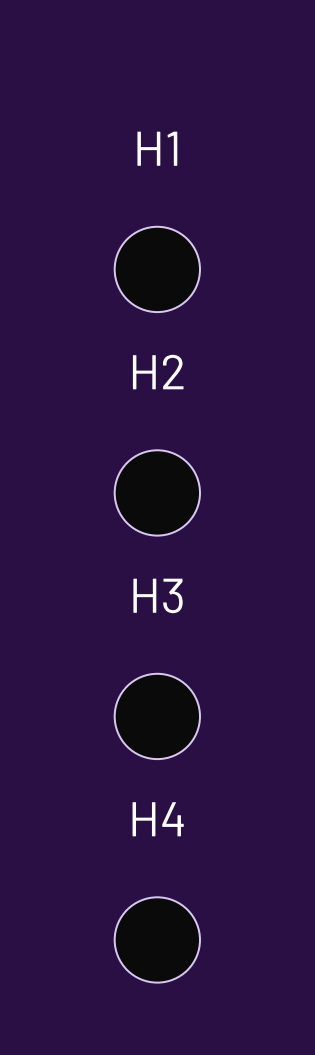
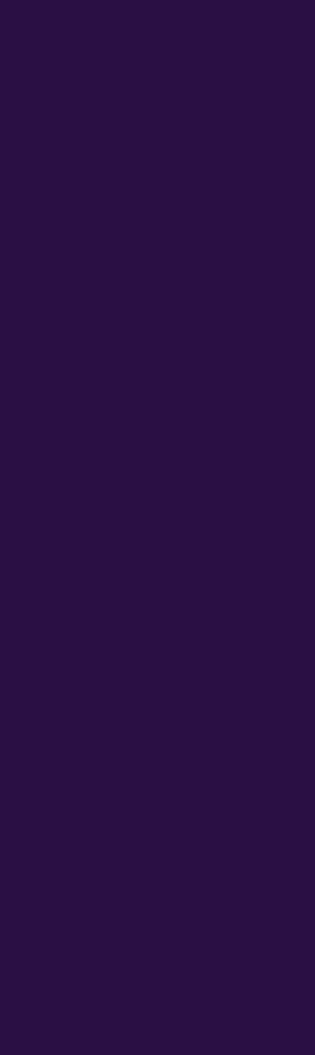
H1: (157, 269) -> none
H2: (157, 492) -> none
H3: (157, 716) -> none
H4: (157, 939) -> none

